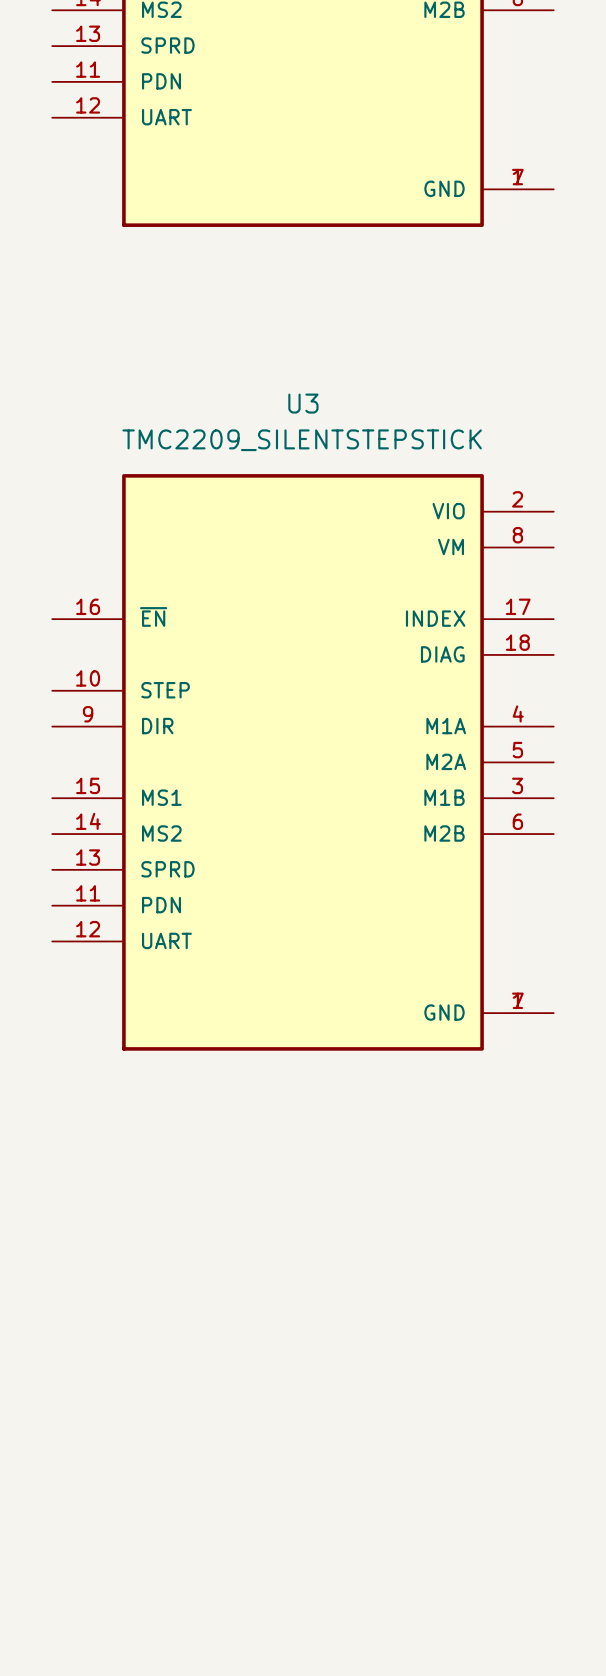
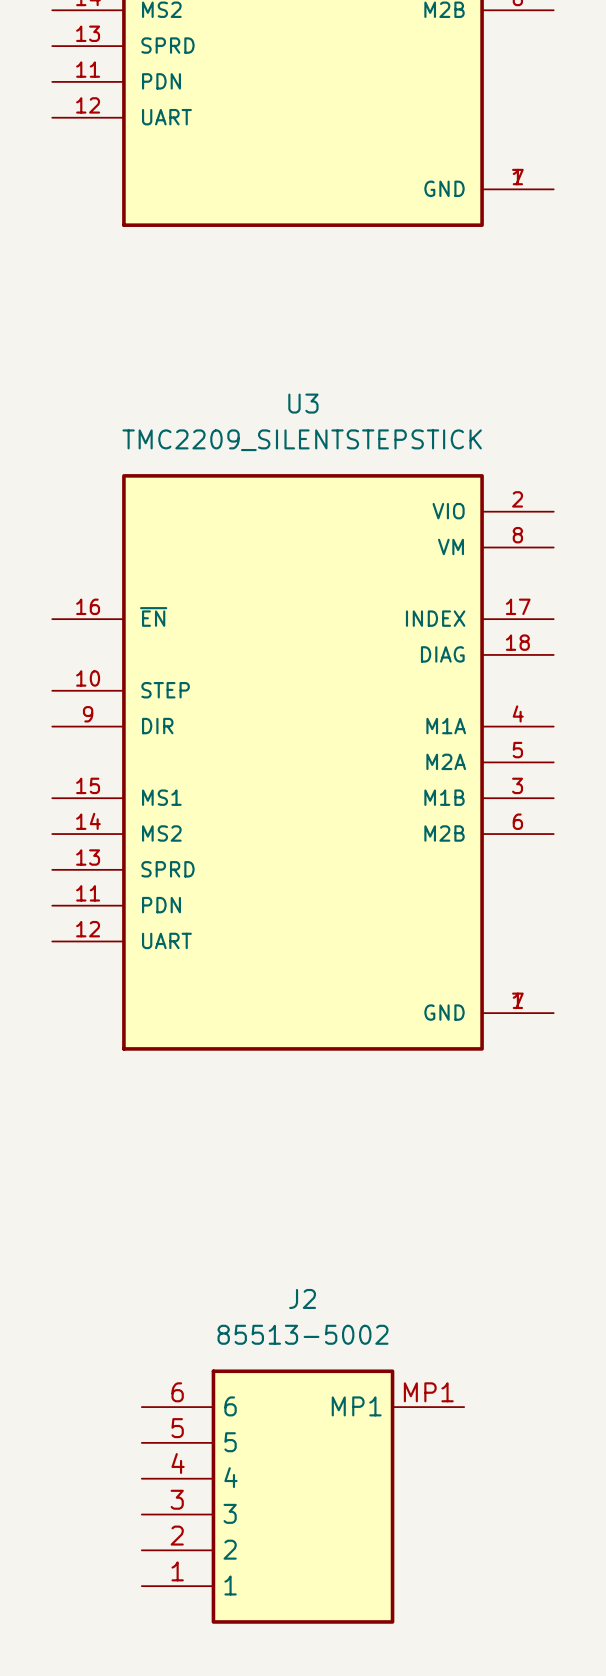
J2: none -> 85513-5002 (302, 1496)

